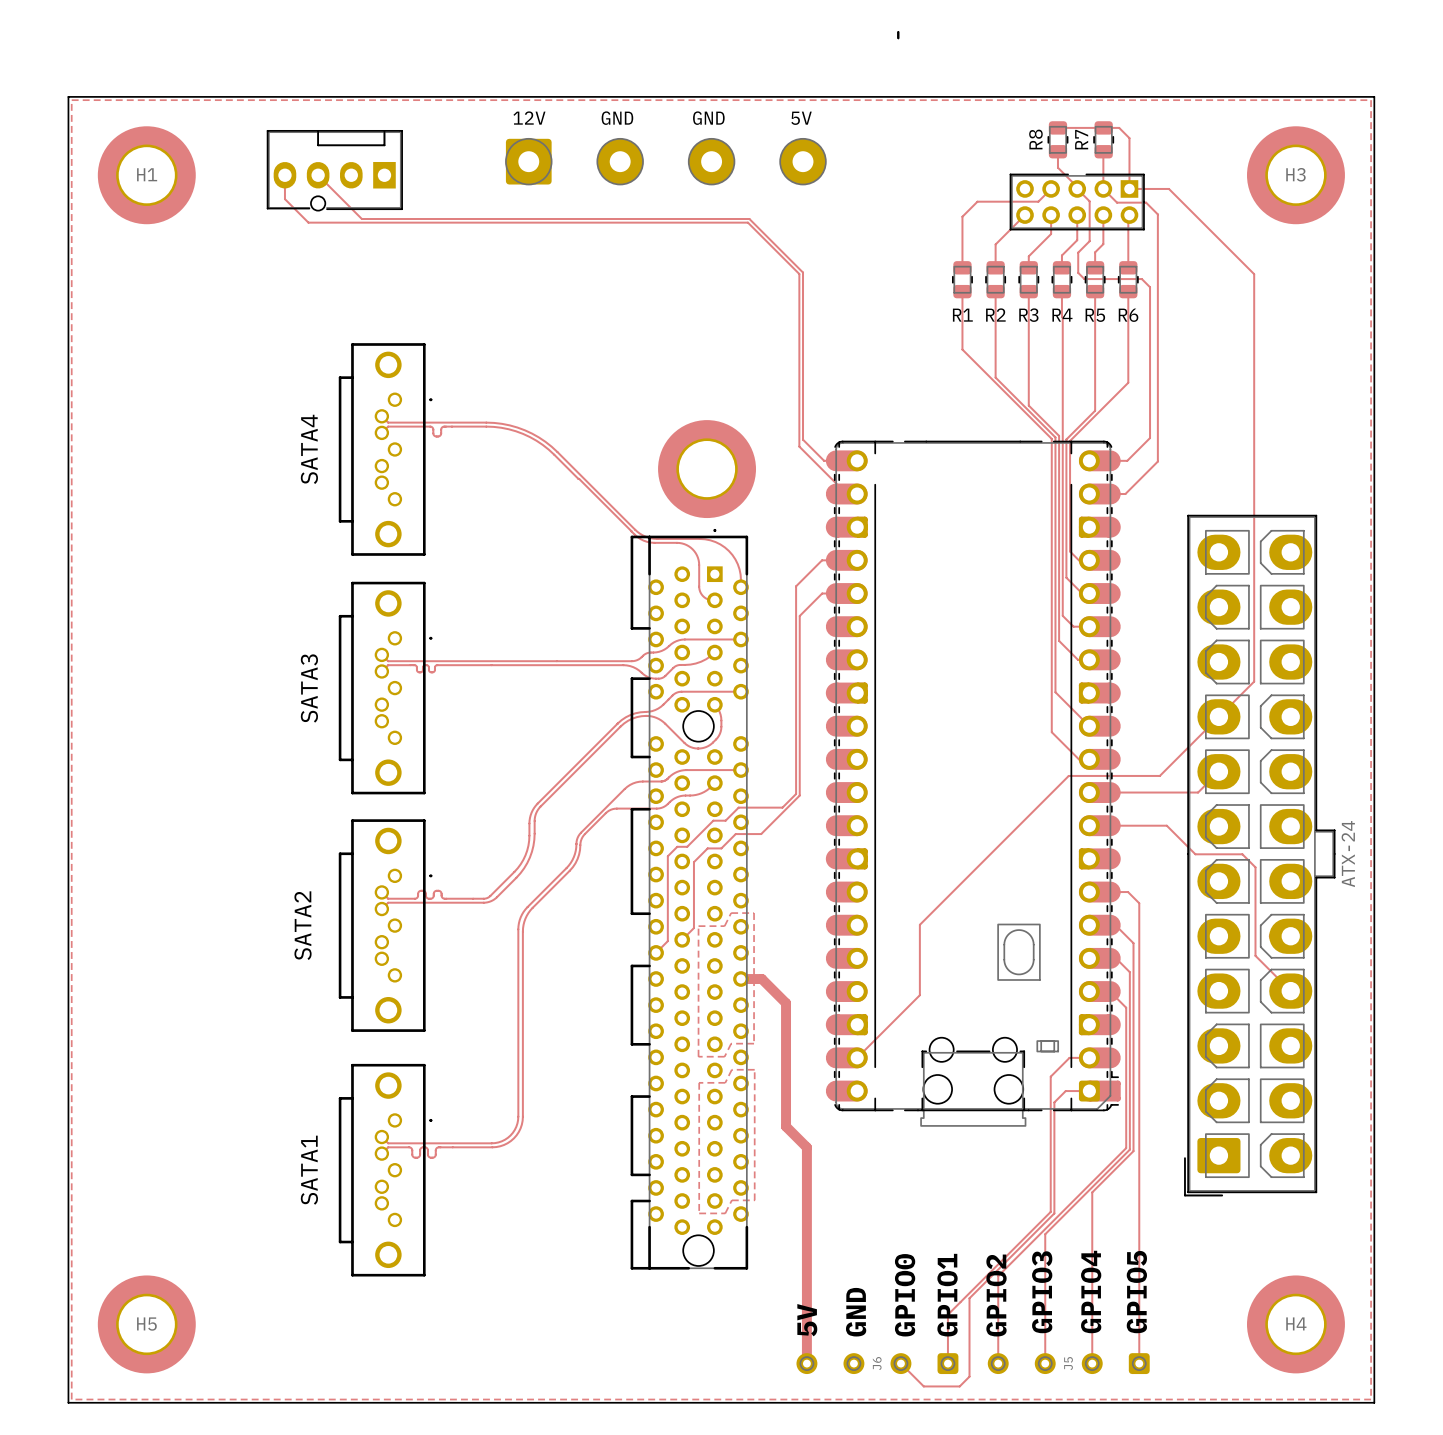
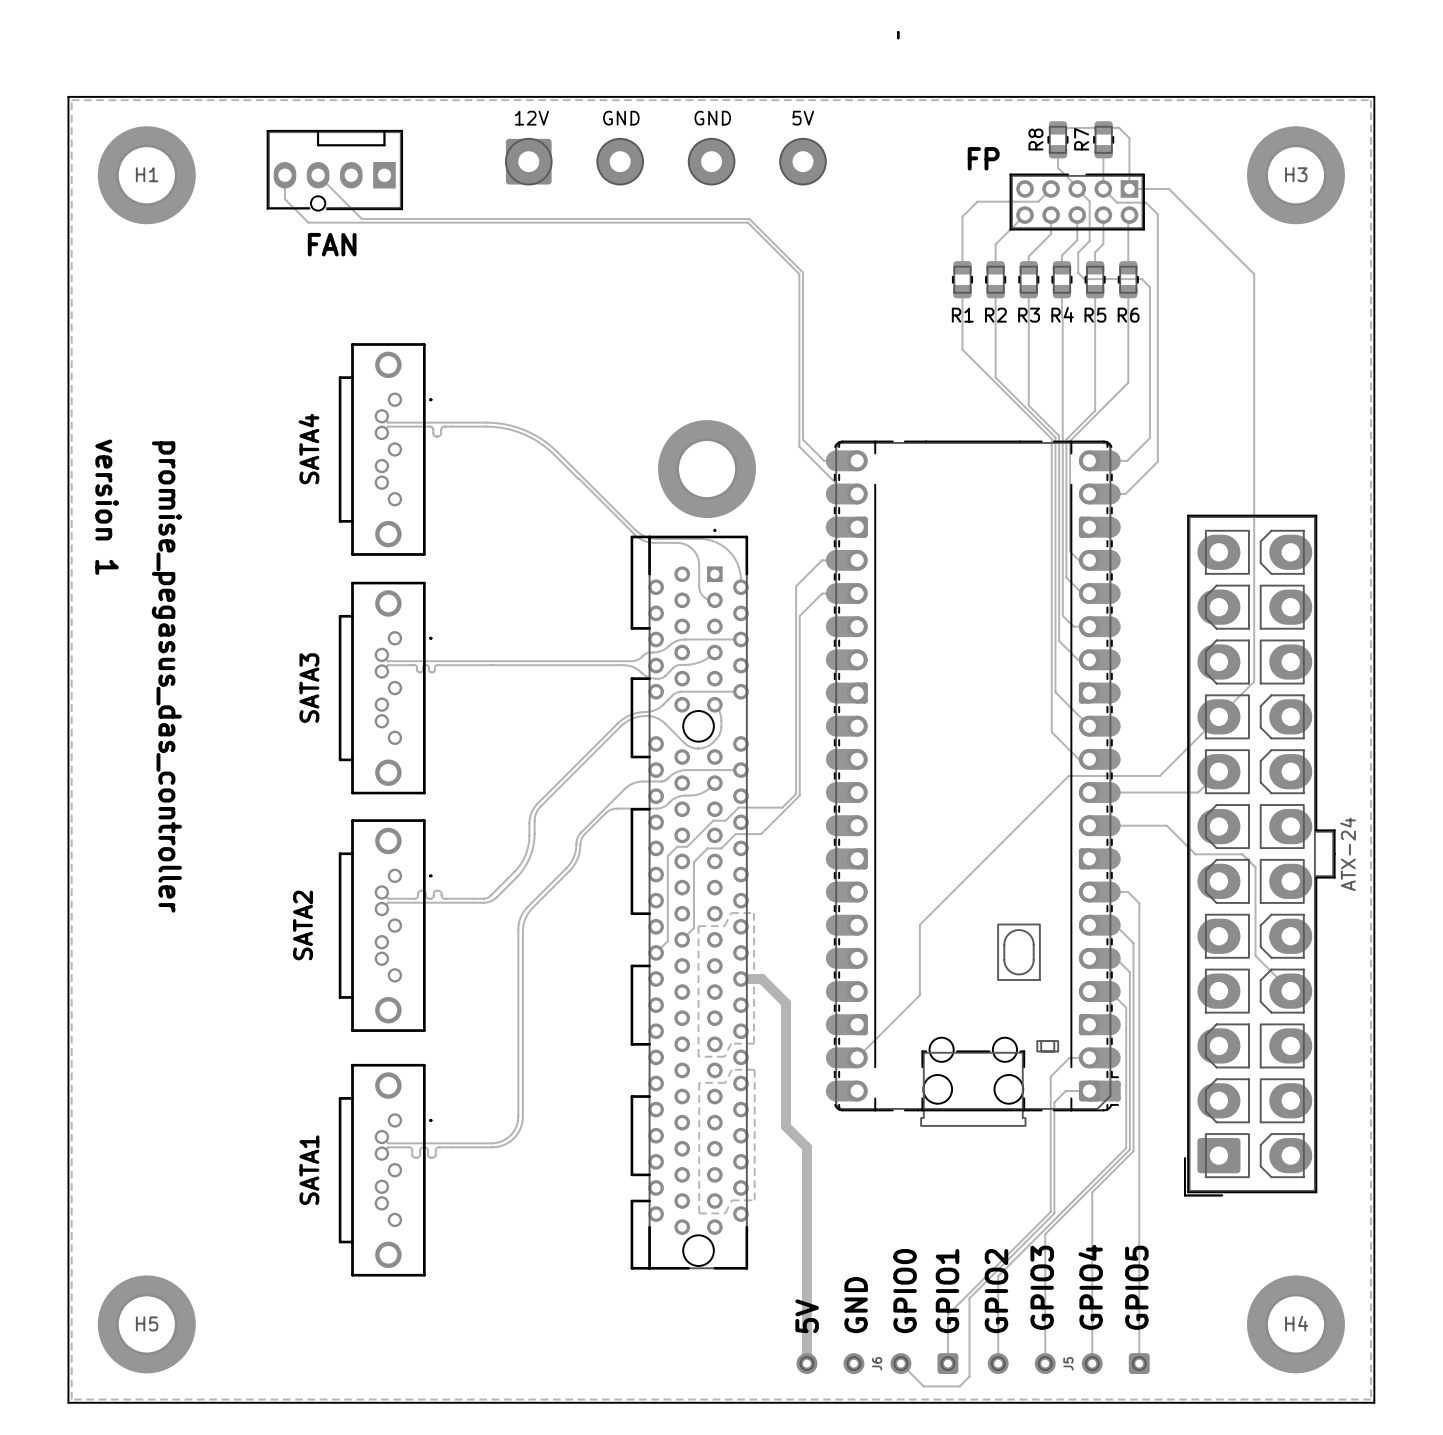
text: none -> FP (983, 158)
text: none -> FAN (332, 244)
text: none -> version 1 (107, 507)
text: none -> promise_pegasus_das_controller (166, 676)

